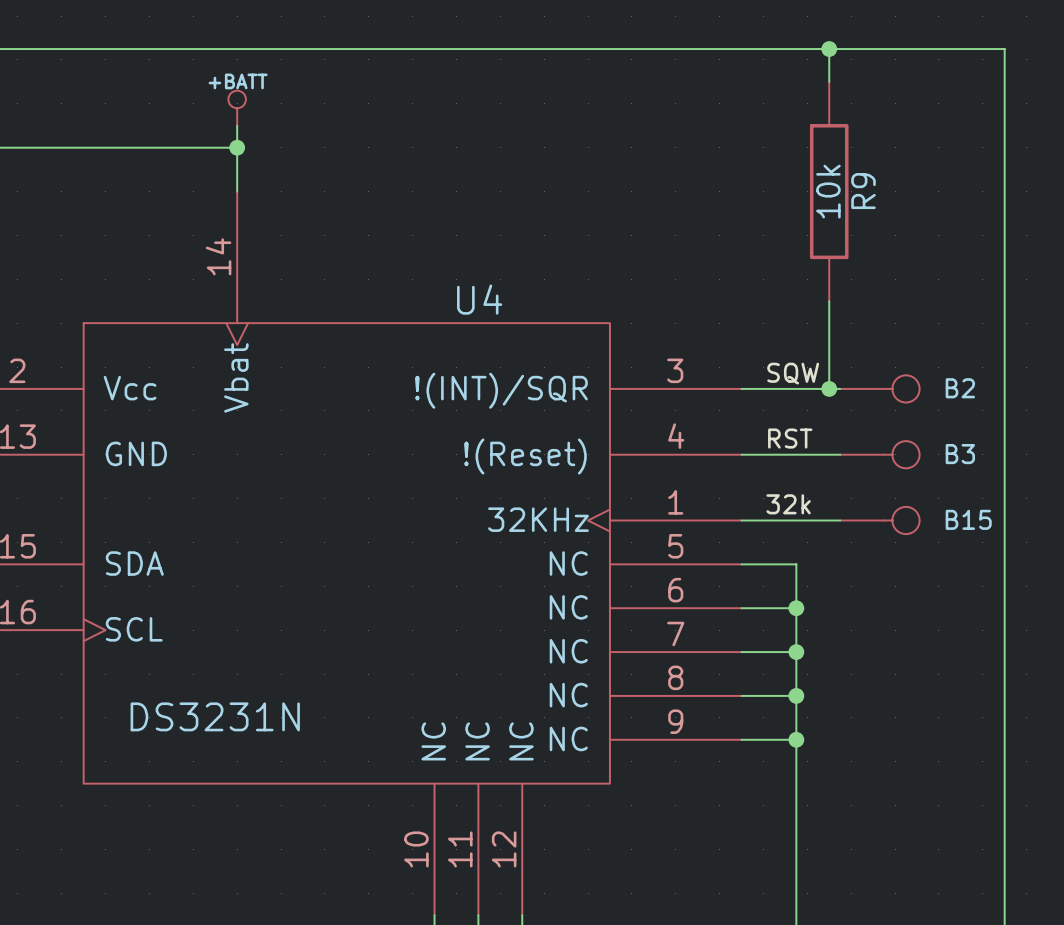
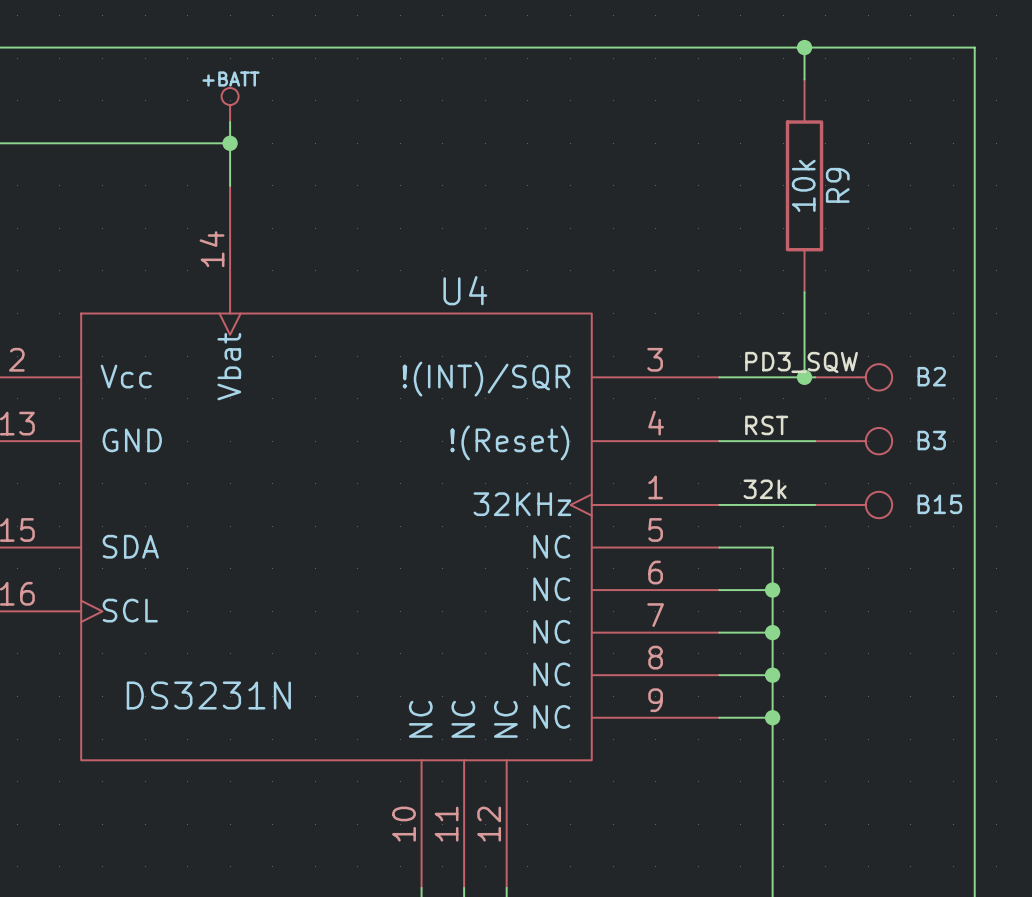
label: SQW (793, 373) -> PD3_SQW (801, 362)

